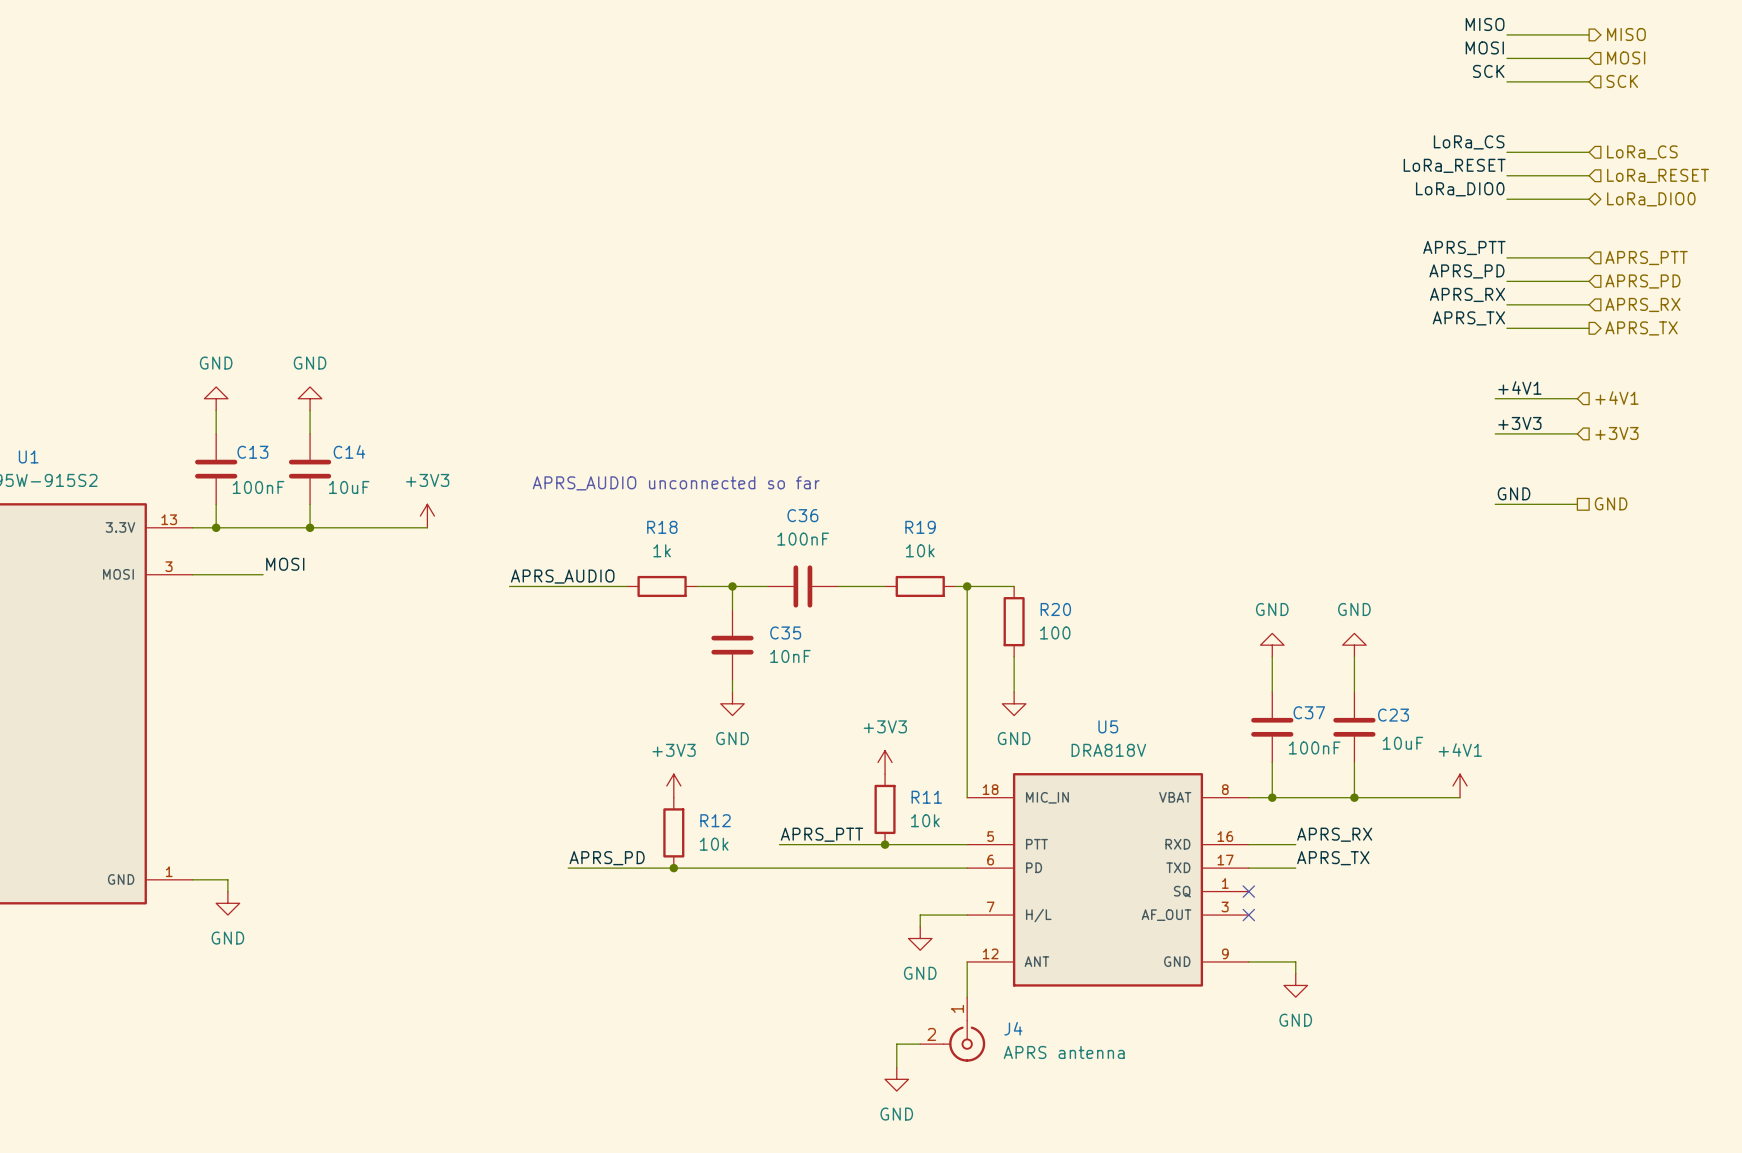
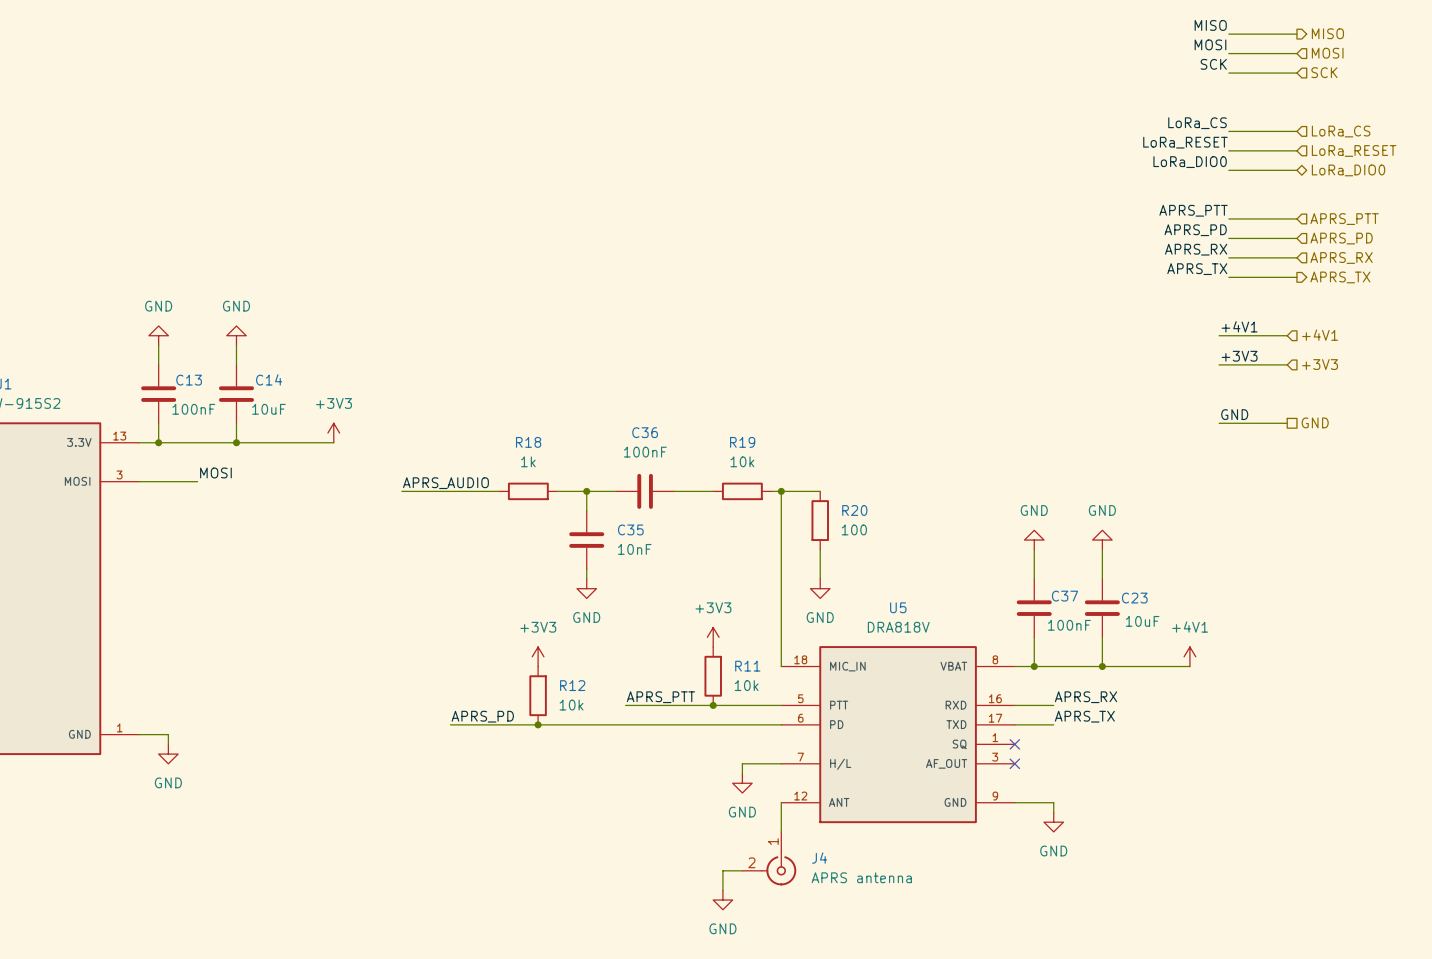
text: APRS_AUDIO unconnected so far (676, 483) -> none

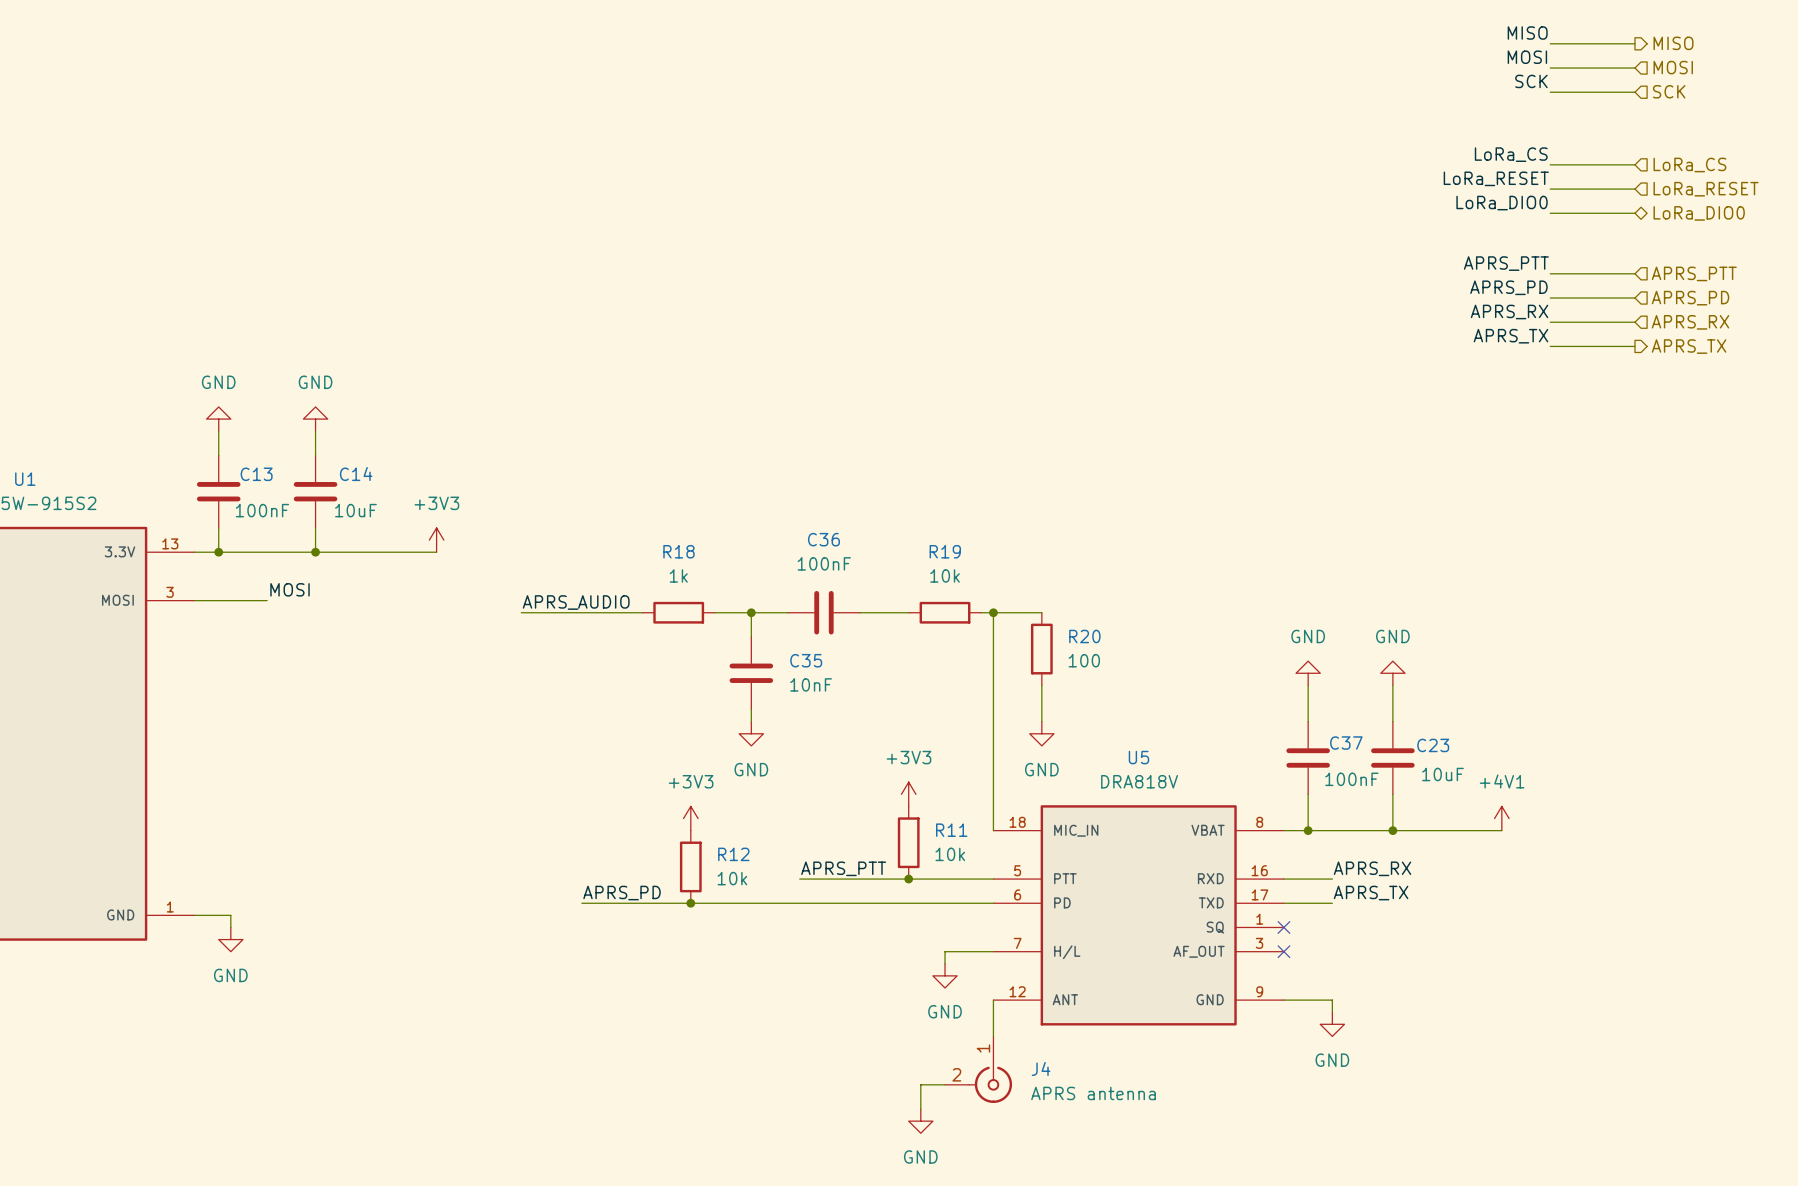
label: +4V1 (1239, 326) -> none
wire: (1219, 335) (1287, 335) -> none
hierarchical label: +4V1 (1320, 335) -> none
label: +3V3 (1239, 356) -> none
wire: (1219, 364) (1287, 364) -> none
hierarchical label: +3V3 (1320, 364) -> none
label: GND (1234, 414) -> none
hierarchical label: GND (1315, 422) -> none
wire: (1219, 423) (1287, 423) -> none

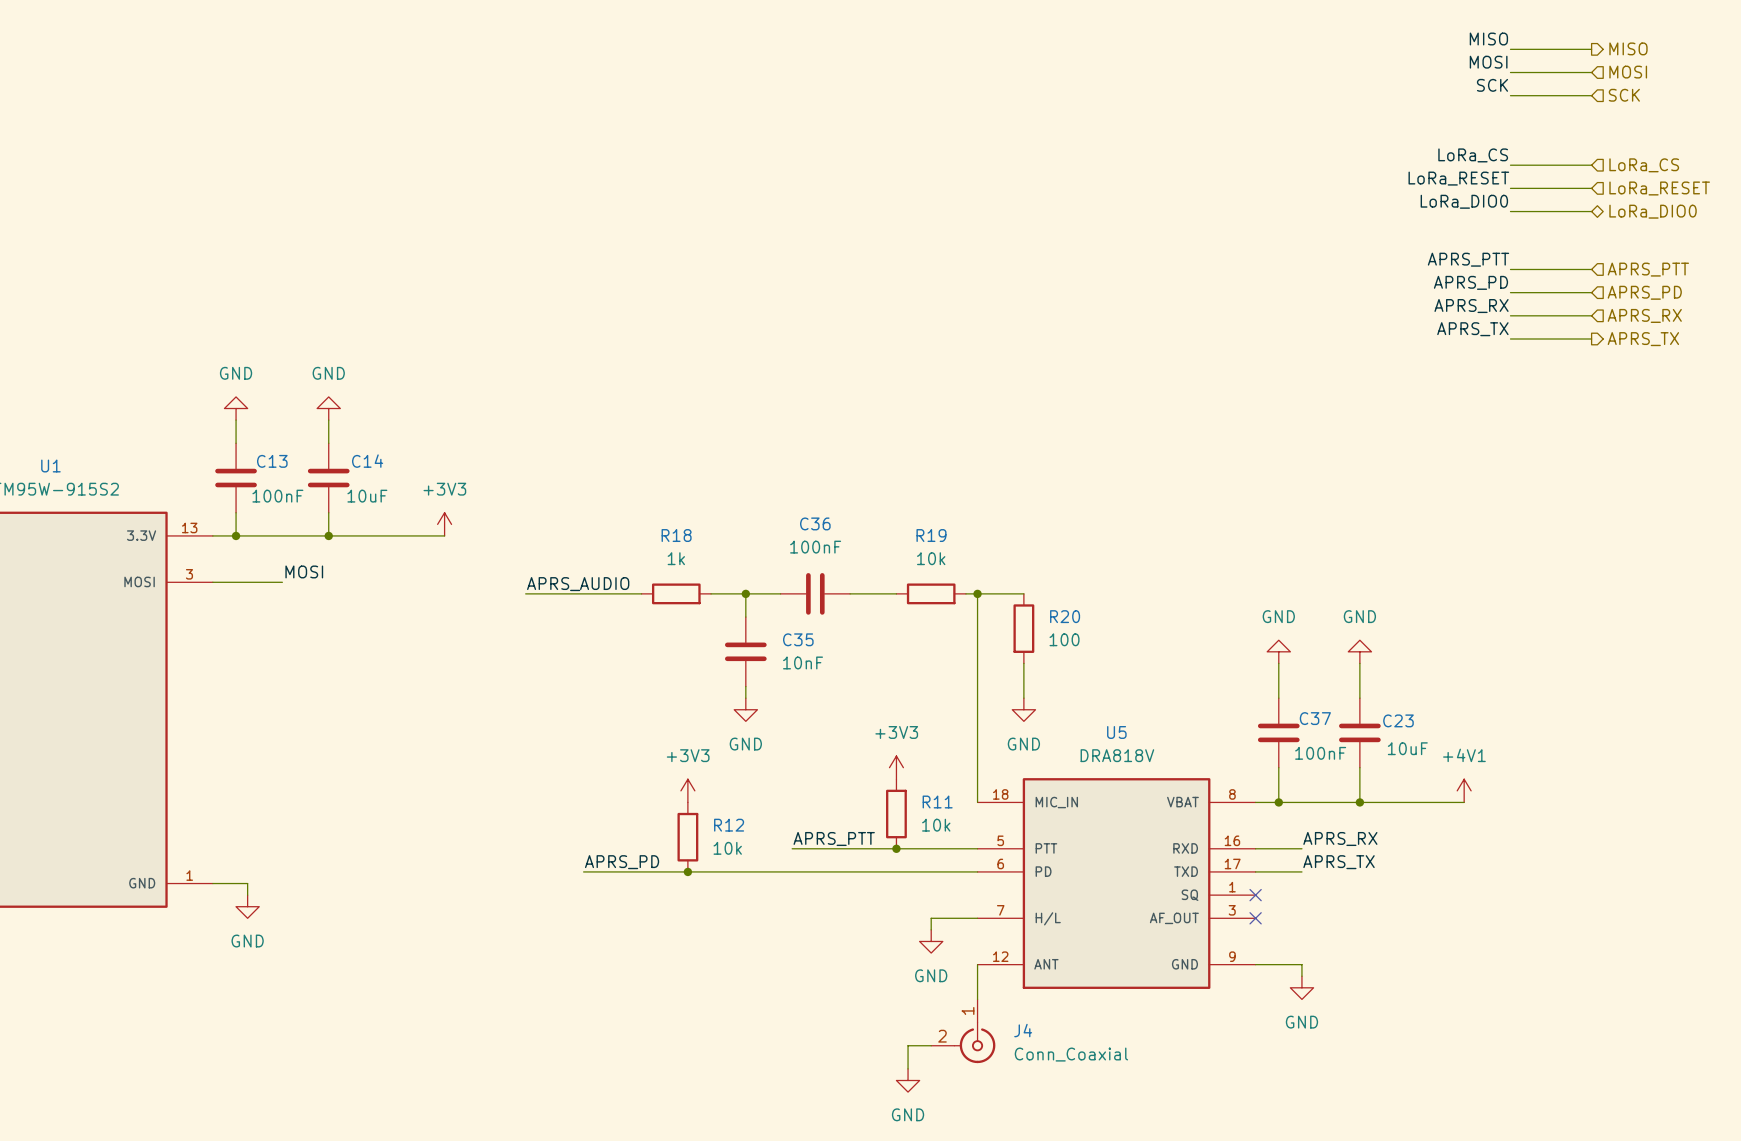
J4 value: APRS antenna (1093, 1093) -> Conn_Coaxial (1071, 1054)

